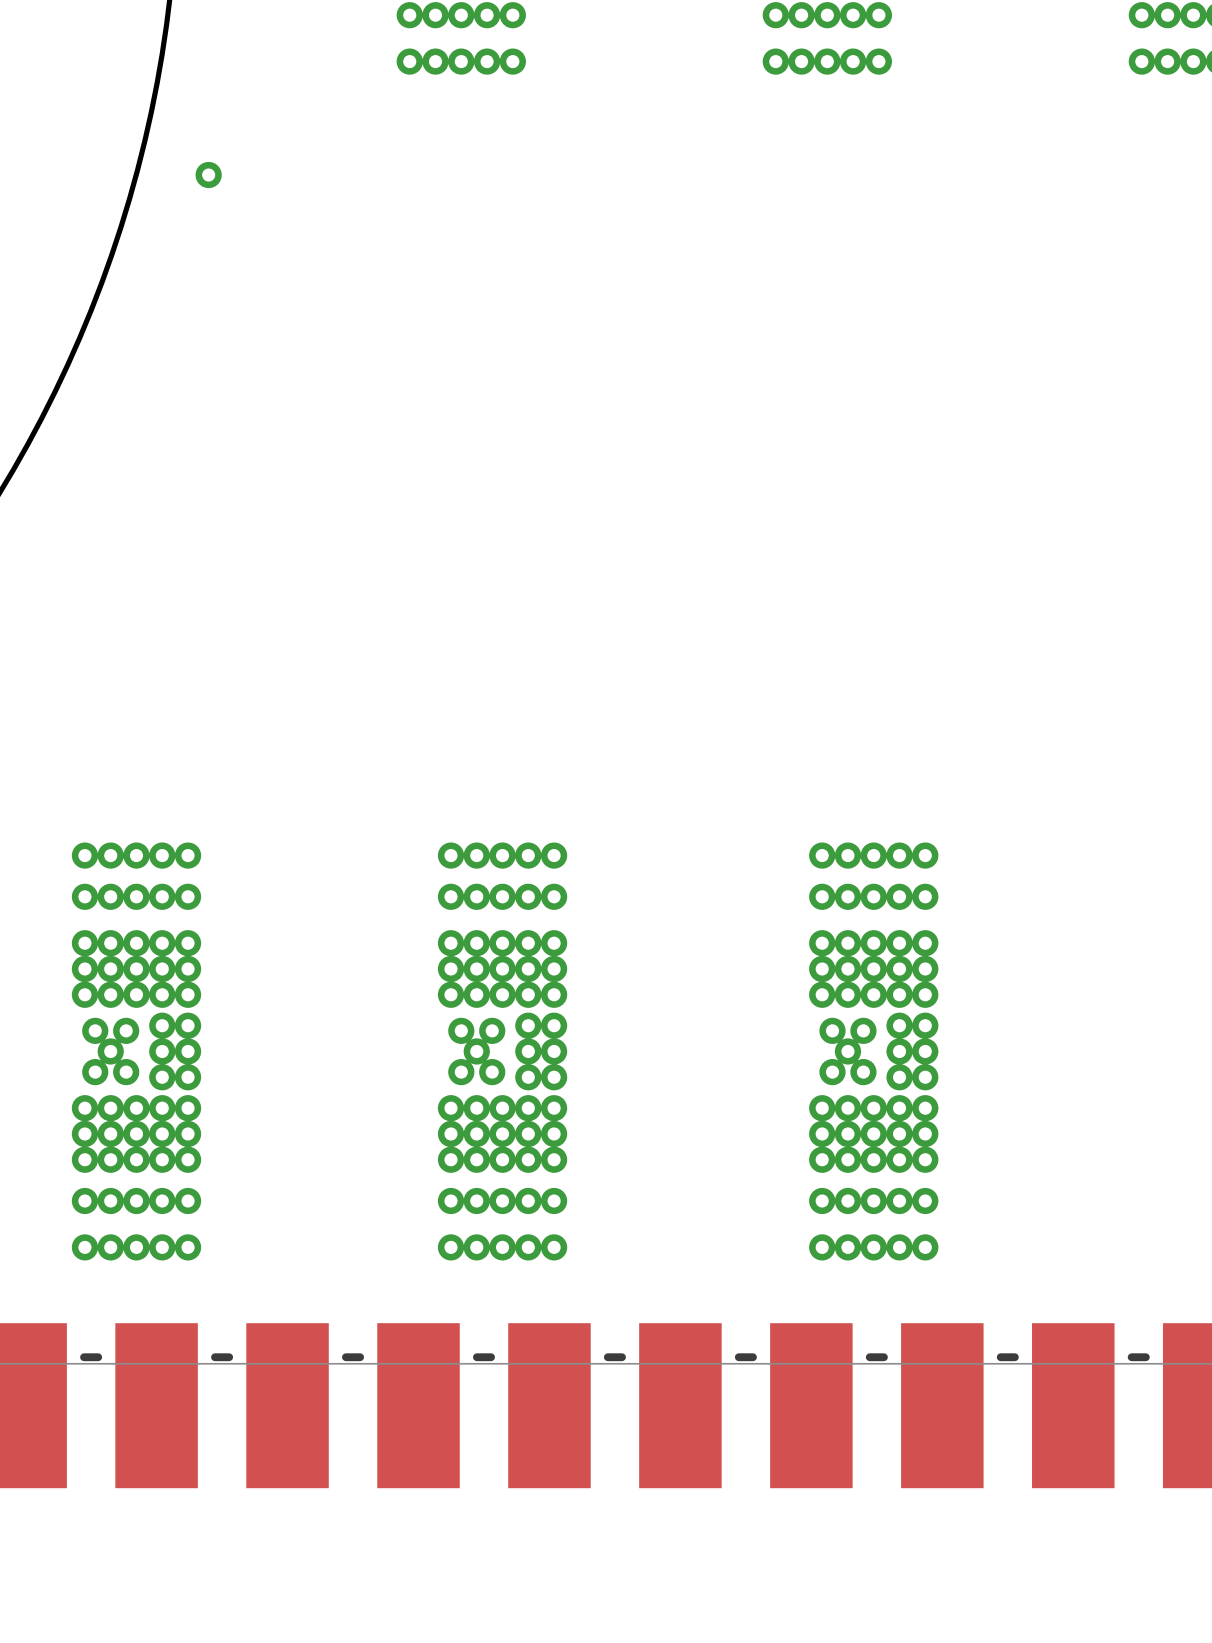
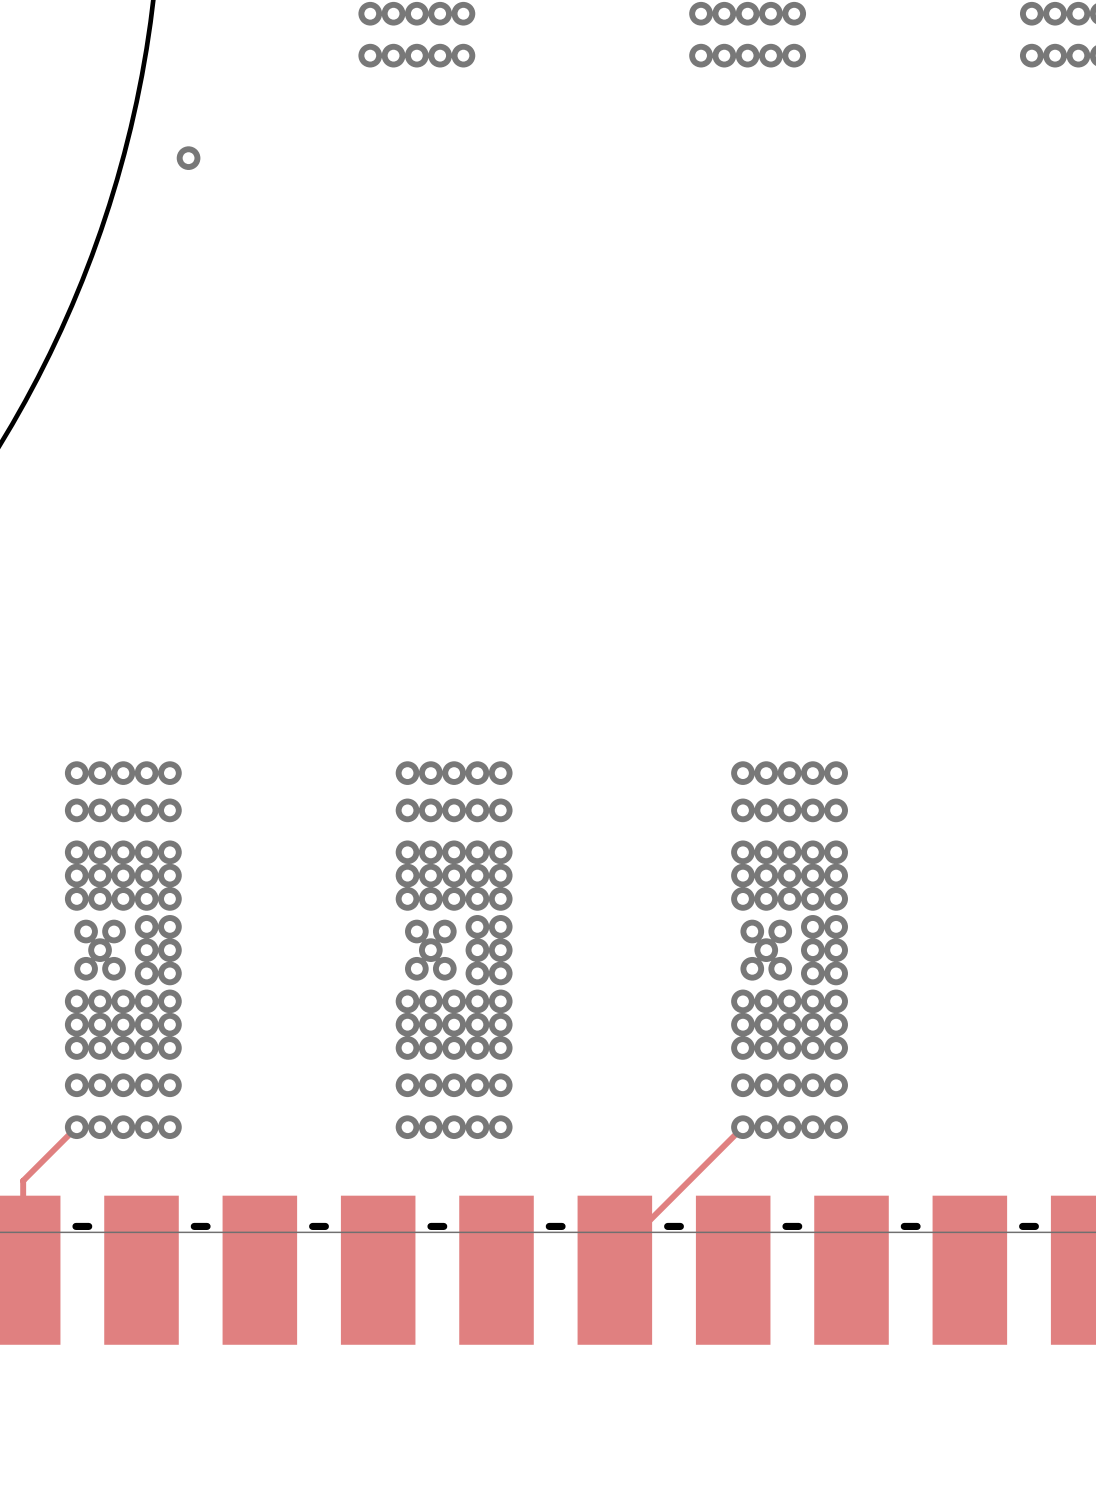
track: none -> (76, 1127) (23, 1180) (23, 1270)
track: none -> (742, 1127) (614, 1255) (614, 1270)

